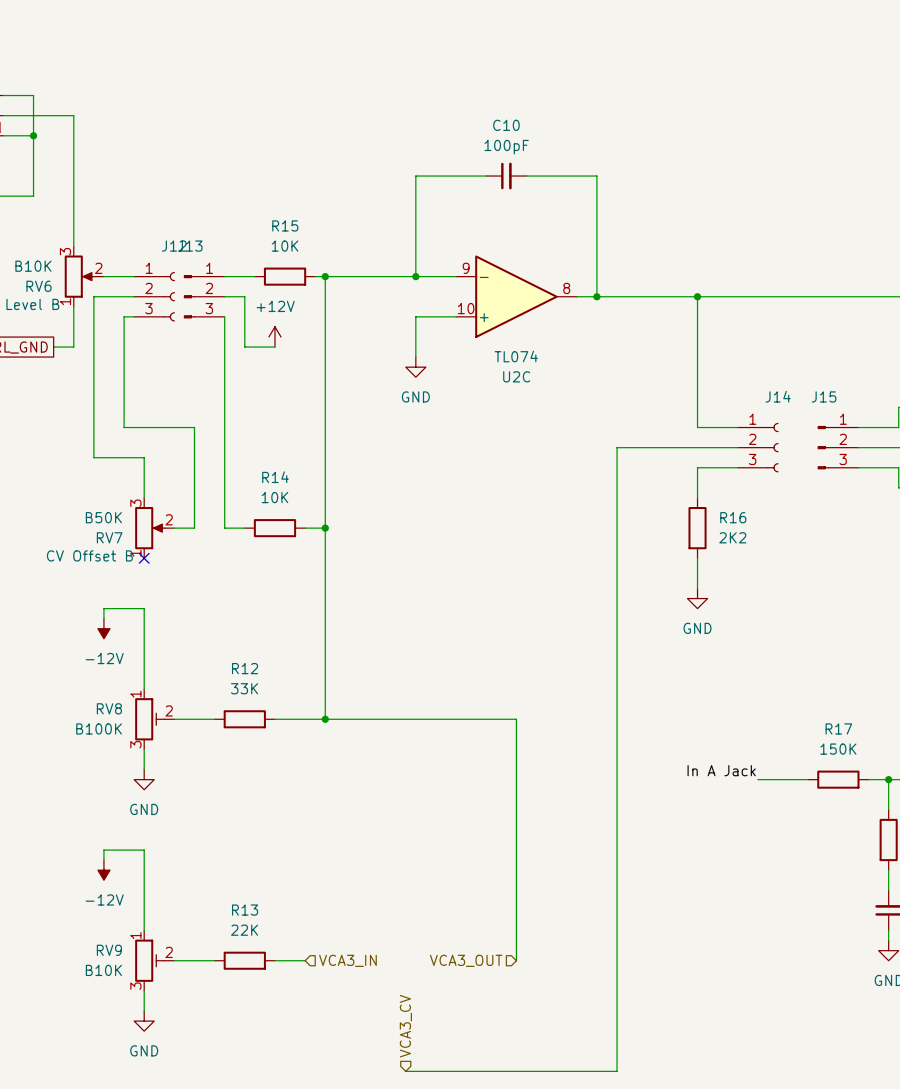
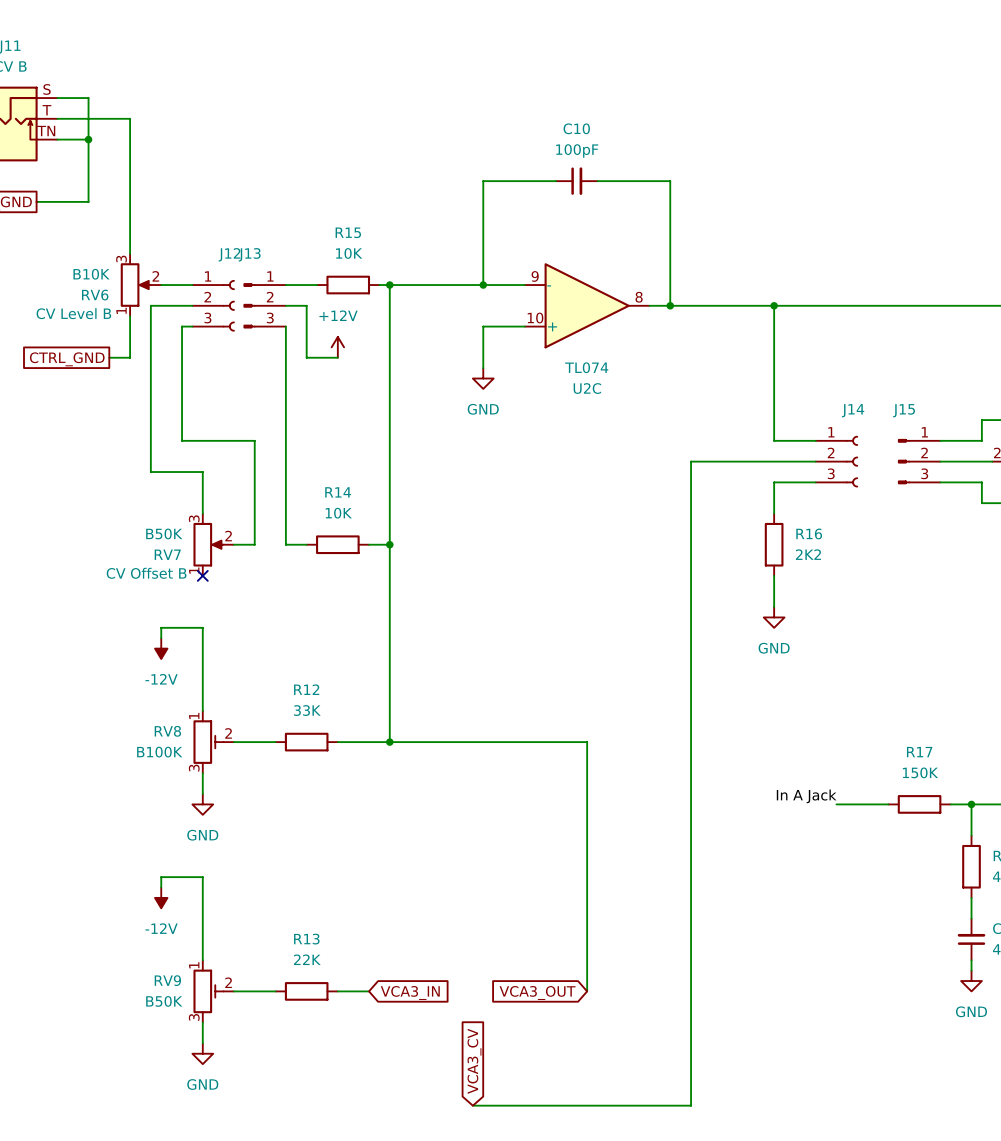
hierarchical label: VCA3_IN (347, 960) -> none
hierarchical label: VCA3_OUT (466, 960) -> none
global label: none -> VCA3_IN (410, 992)
global label: none -> VCA3_OUT (537, 992)
RV9 value: B10K (103, 970) -> B50K (164, 1001)
hierarchical label: VCA3_CV (405, 1026) -> none
global label: none -> VCA3_CV (474, 1061)

